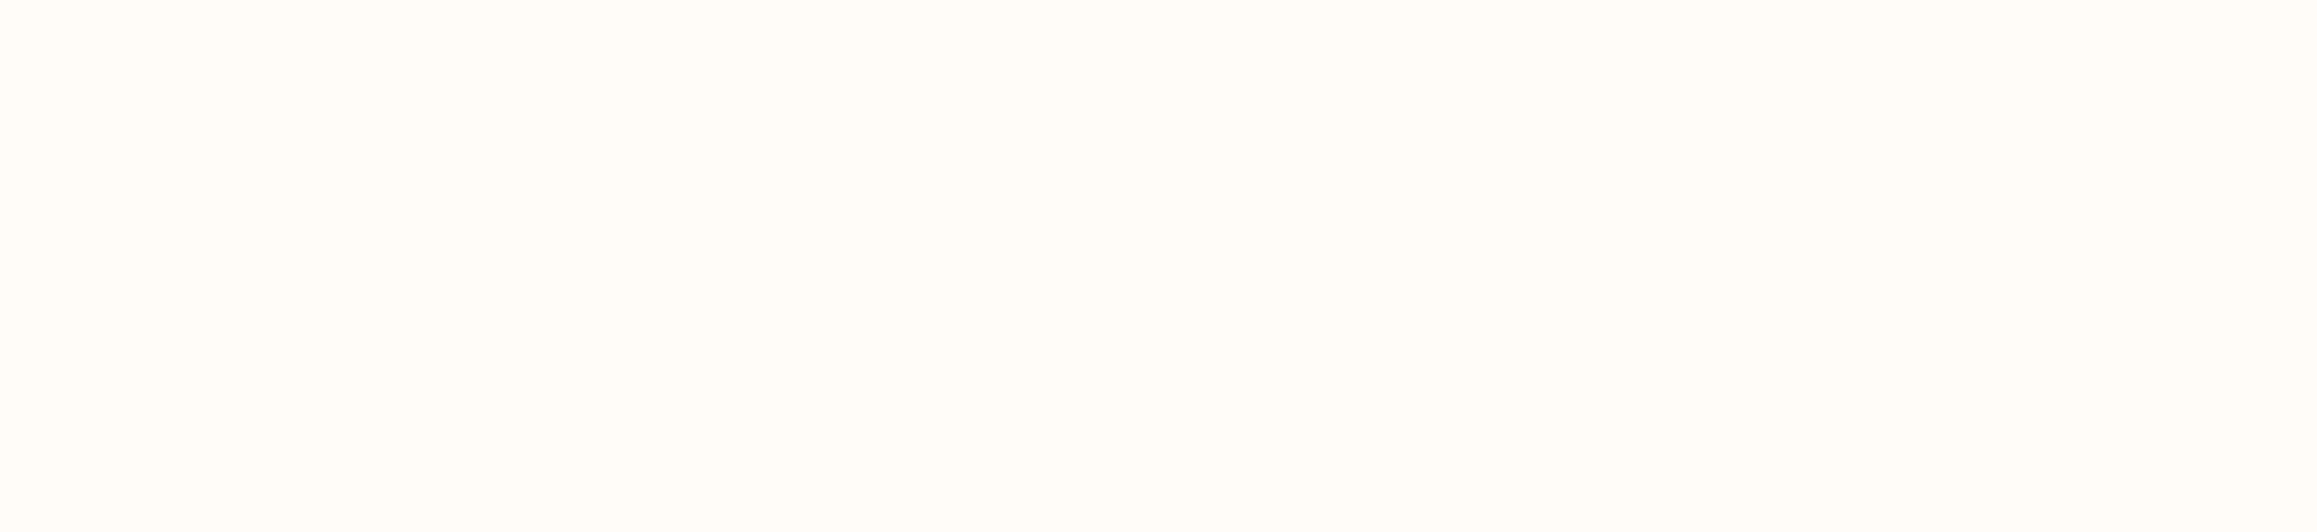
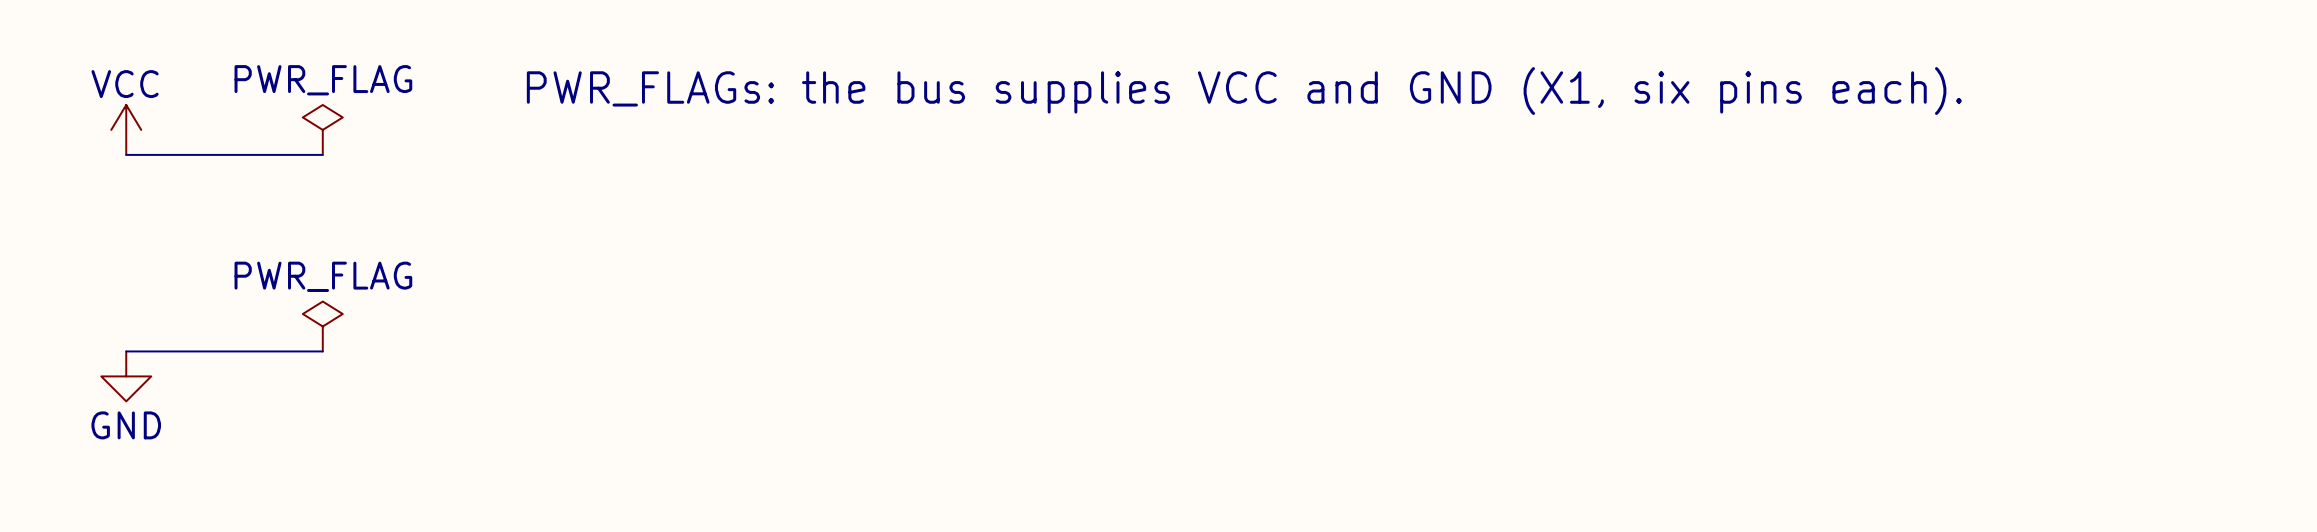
text: none -> PWR_FLAGs: the bus supplies VCC and GND (X1, six pins each). (1244, 91)
power symbol: none -> VCC (126, 129)
power symbol: none -> PWR_FLAG (322, 129)
wire: none -> (126, 154) (322, 154)
power symbol: none -> PWR_FLAG (322, 326)
wire: none -> (126, 351) (322, 351)
power symbol: none -> GND (126, 376)

